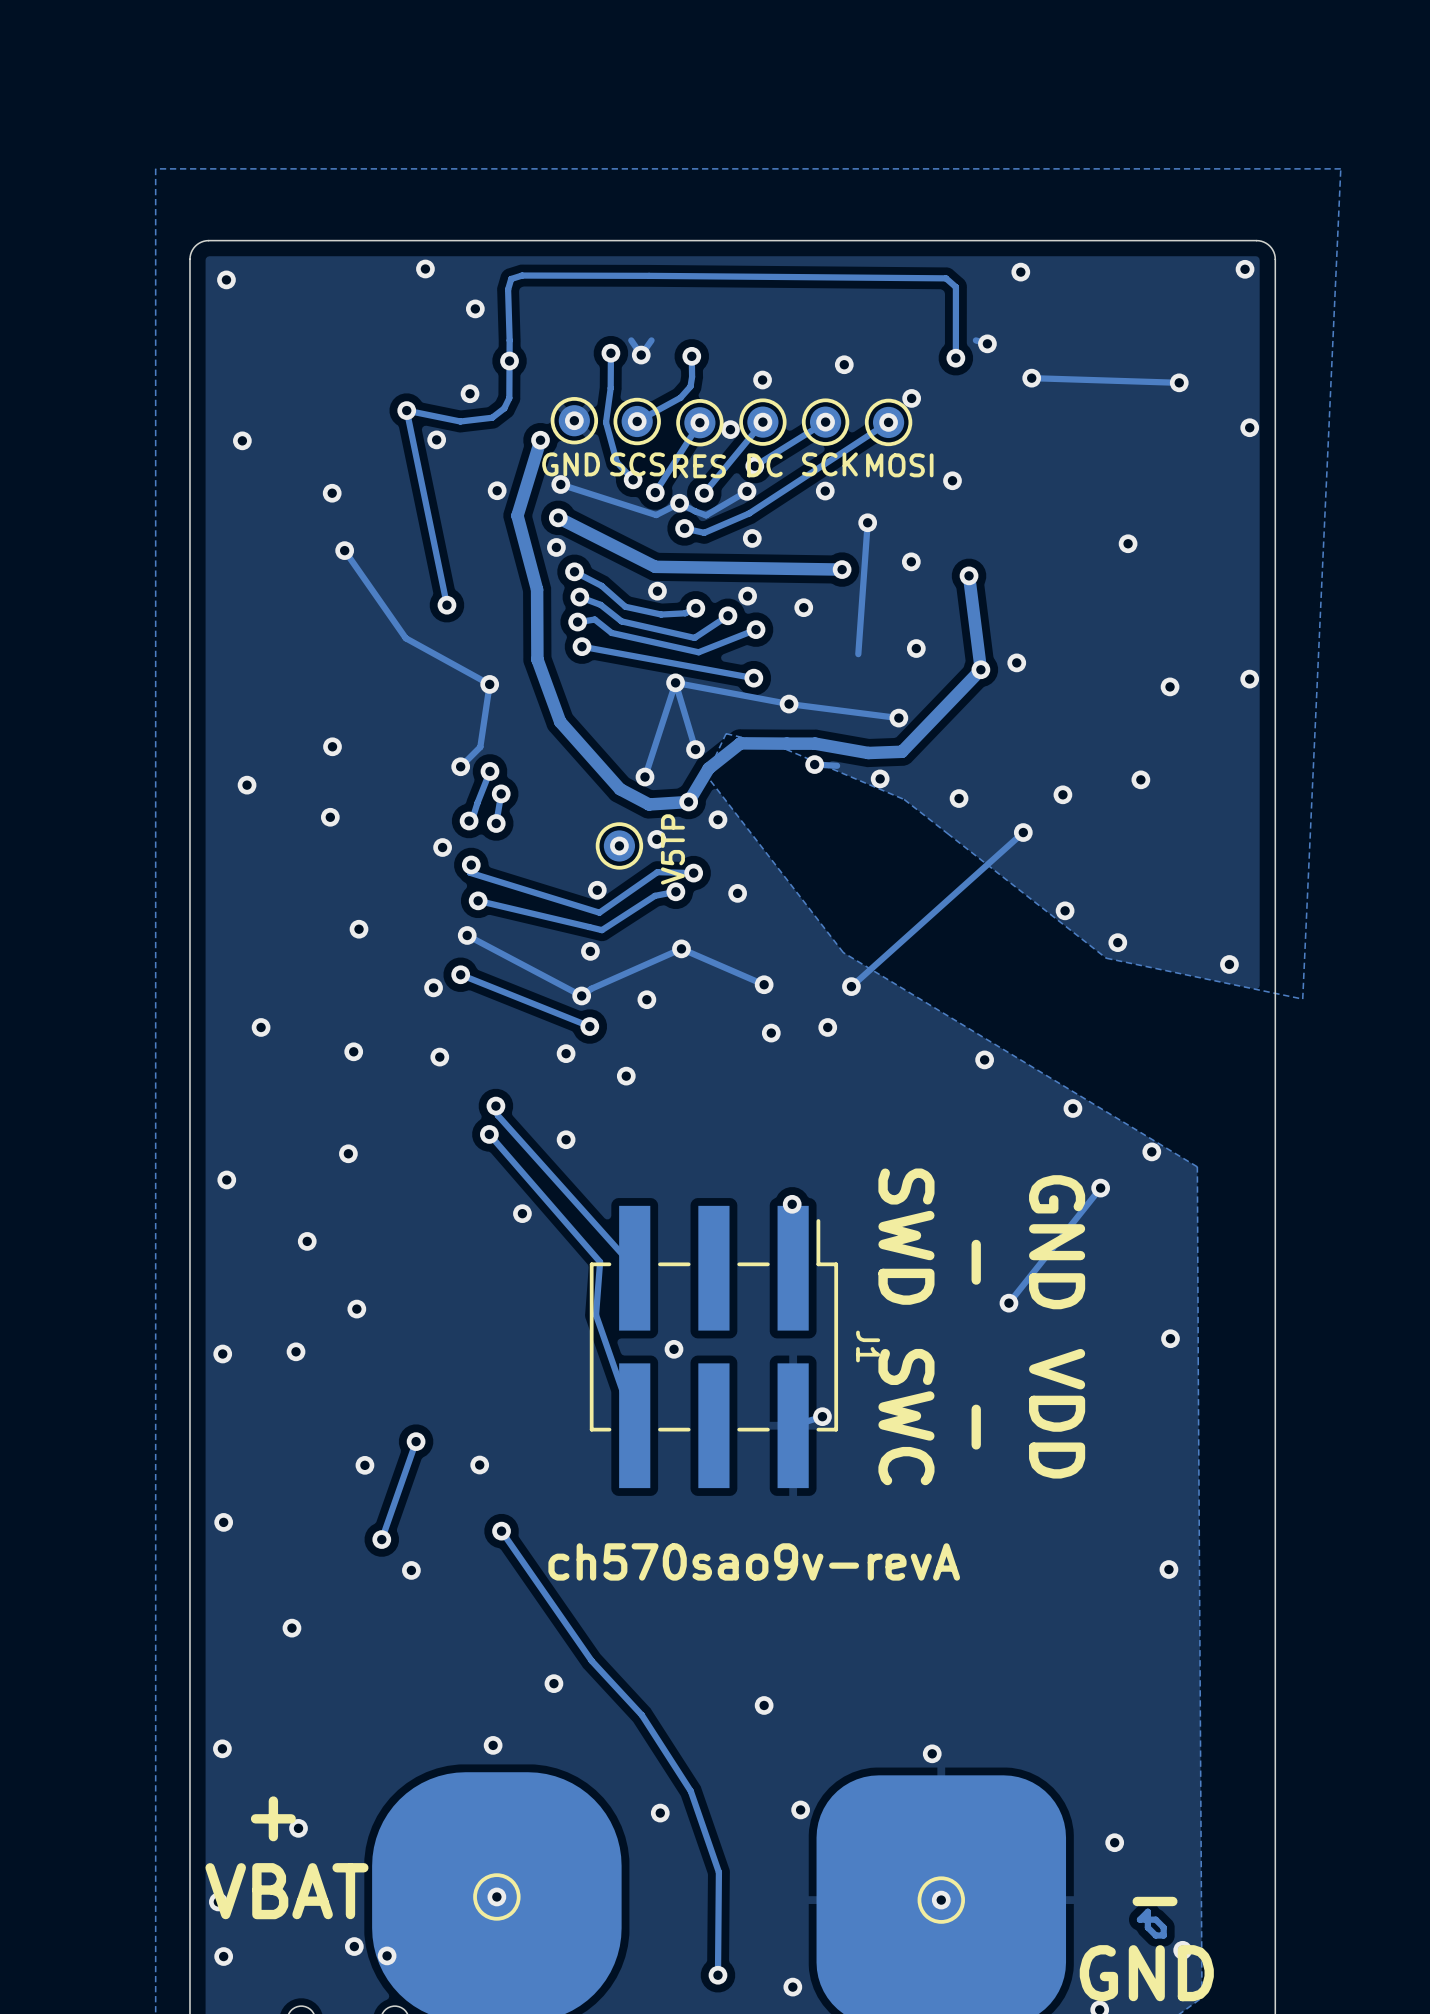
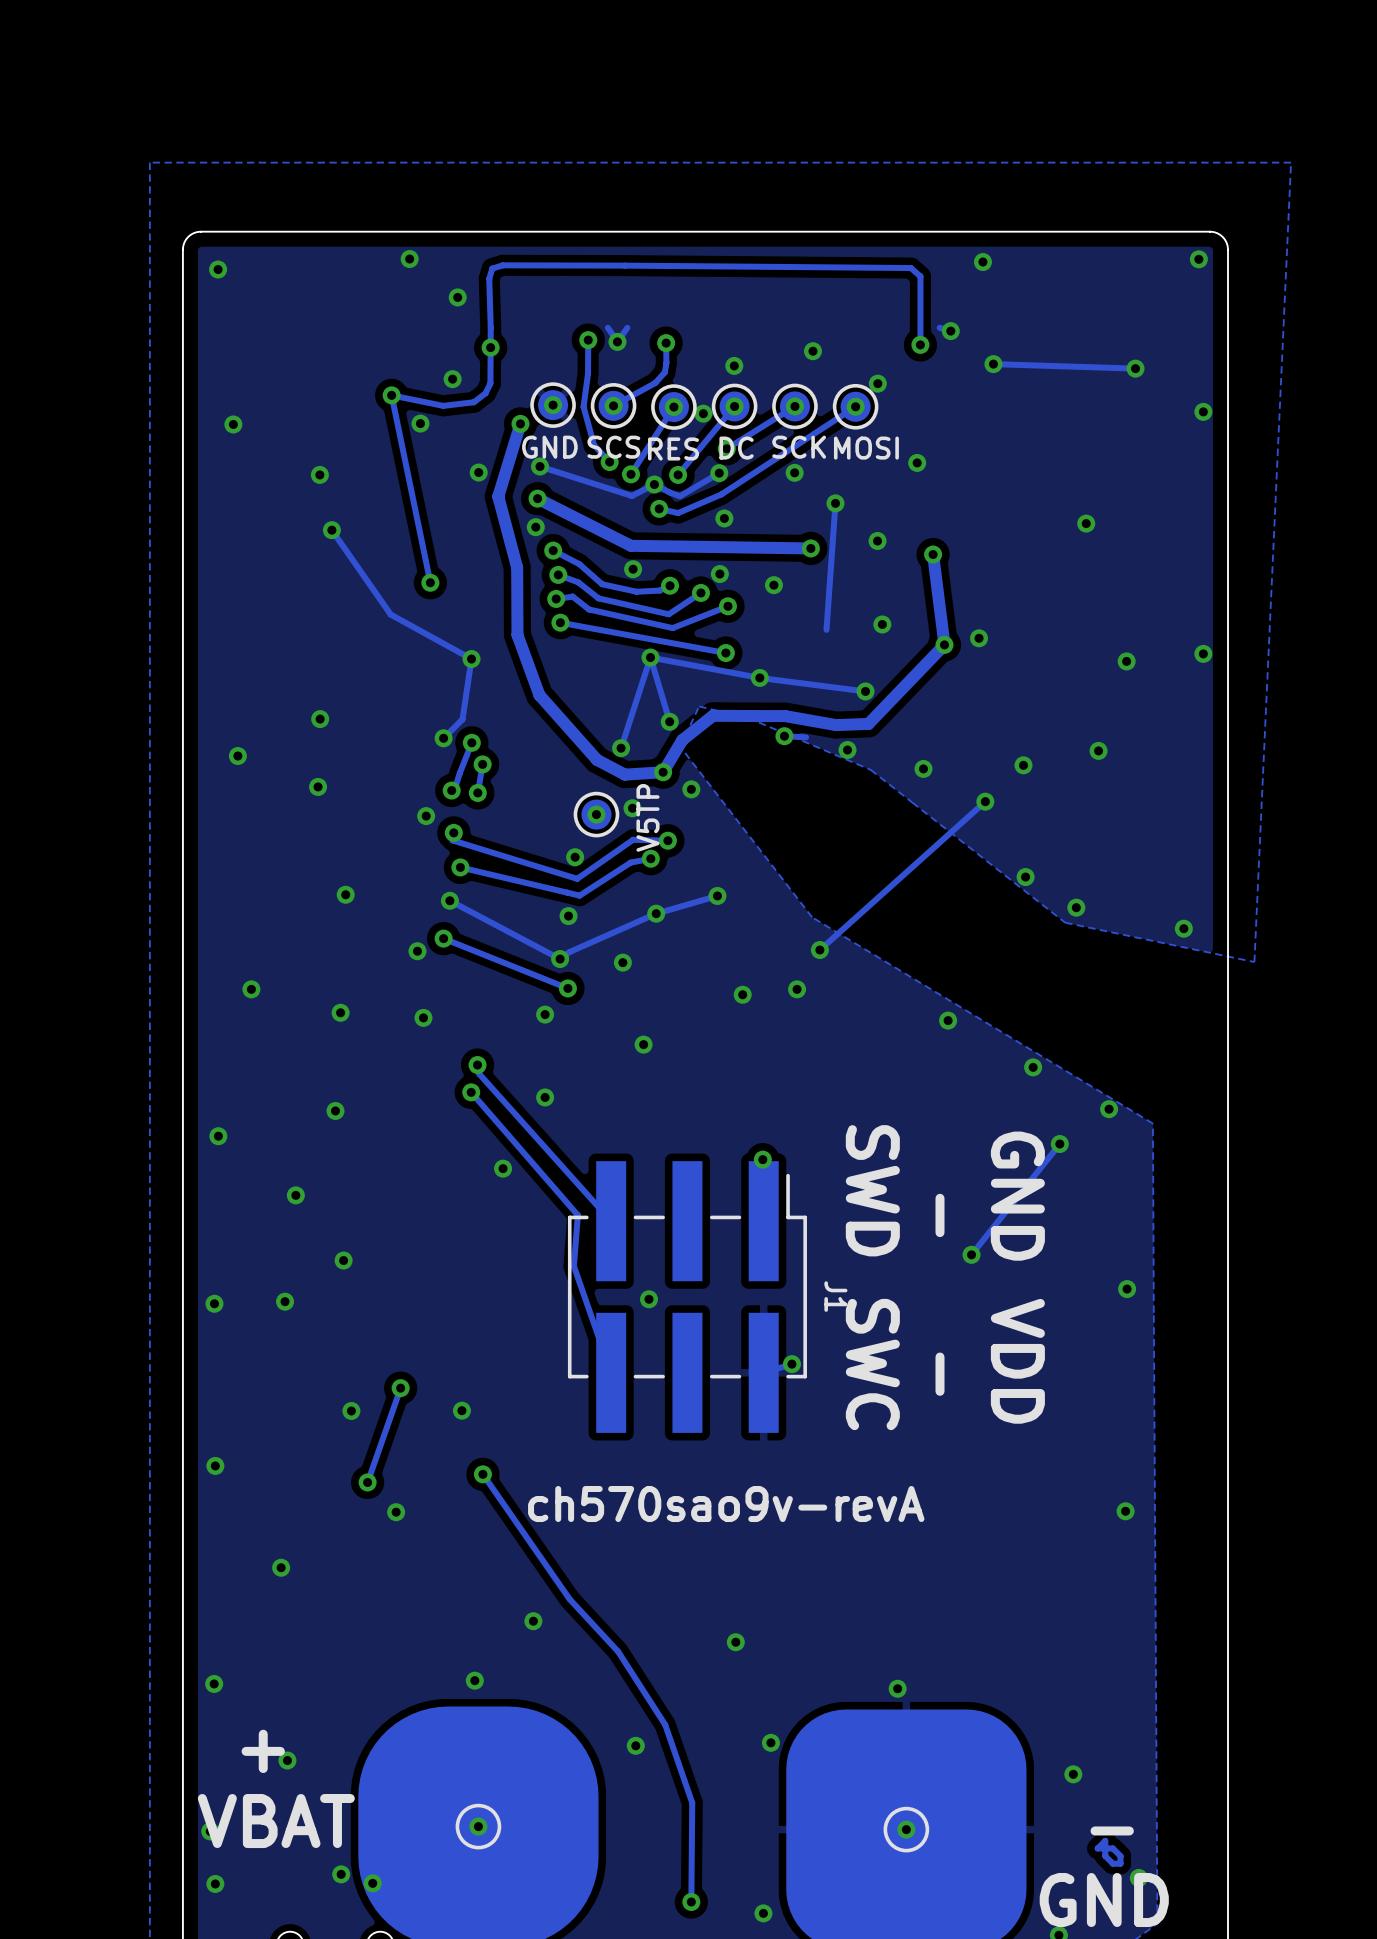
via: (737, 893) -> none
via: none -> (717, 895)
track: (681, 948) (764, 984) -> (656, 913) (717, 895)
via: (764, 984) -> none
via position: (626, 1076) -> (643, 1044)

